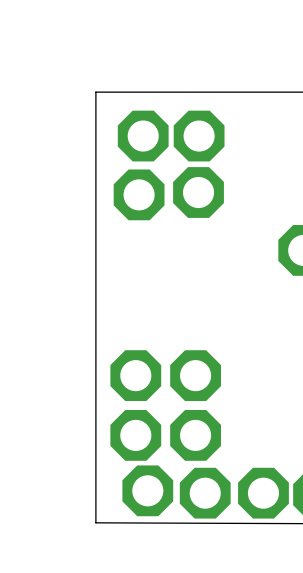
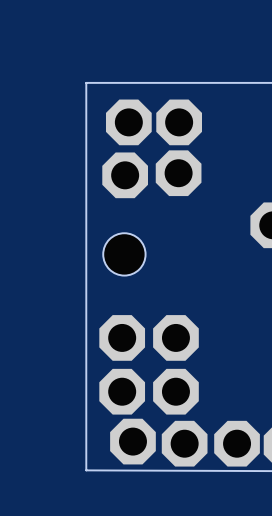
hole: none -> (124, 254)

